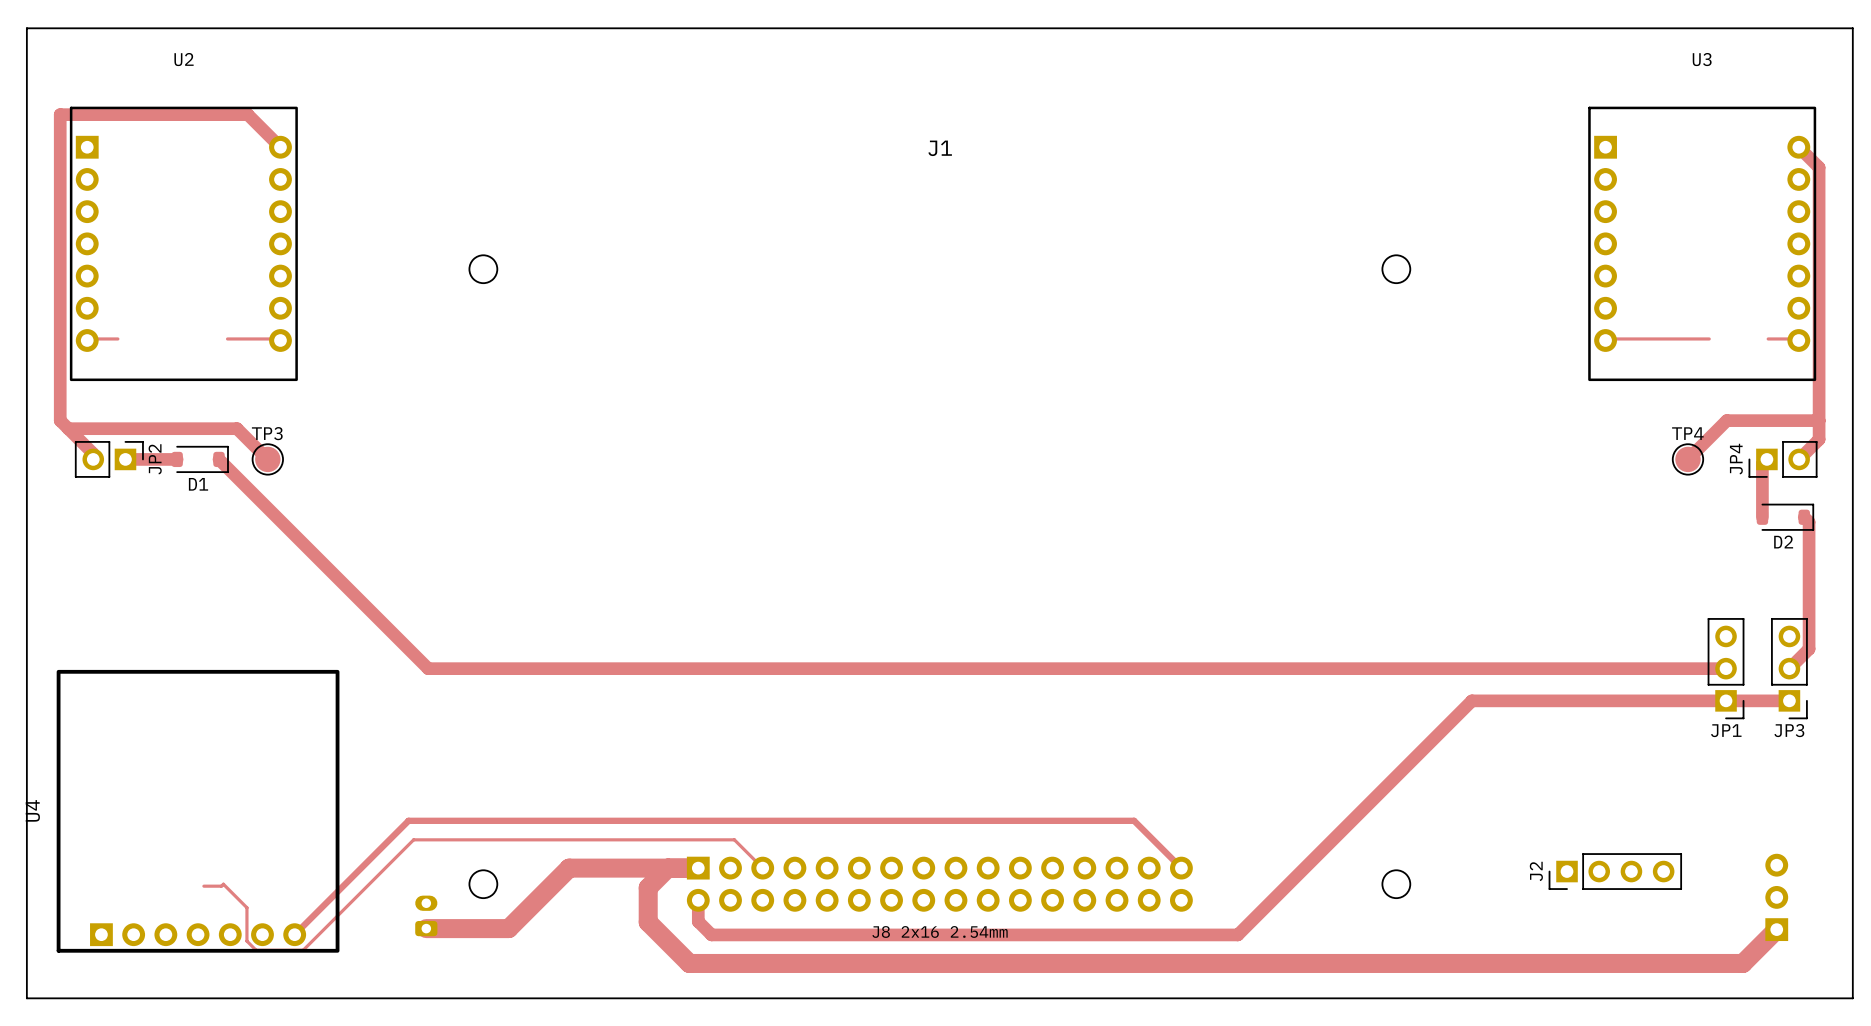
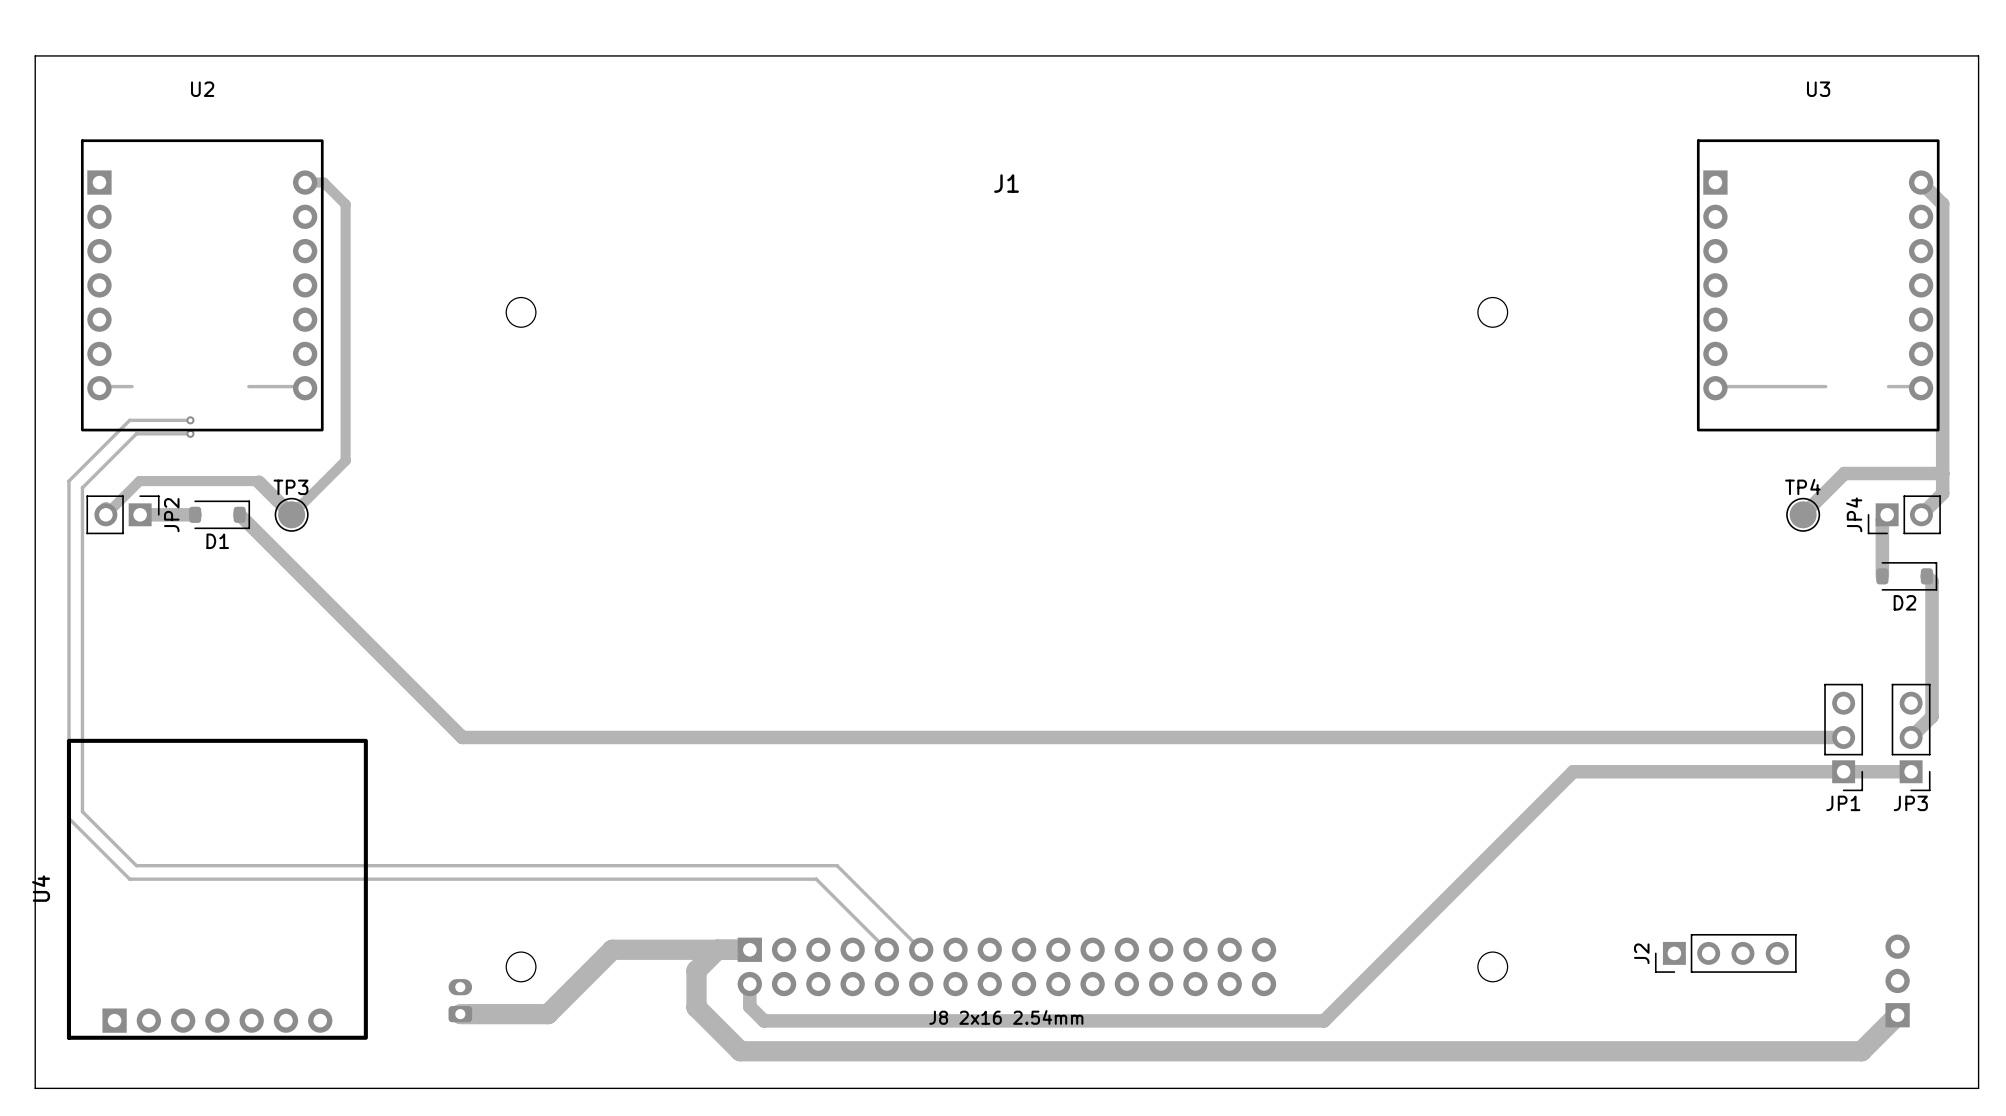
track: (280, 147) (247, 114) (60, 114) (60, 420) (93, 453) -> (305, 182) (323, 182) (345, 204) (345, 460) (291, 514)
track: none -> (190, 420) (129, 420) (68, 481) (68, 818) (129, 879) (816, 879) (886, 949)
via: none -> (190, 420)
track: none -> (190, 433) (136, 433) (82, 487) (82, 811) (136, 865) (837, 865) (921, 949)
via: none -> (190, 433)
track: (68, 428) (237, 428) -> (105, 514) (139, 481) (258, 482)
track: (762, 868) (734, 839) (413, 839) (303, 950) (256, 950) (246, 941) (246, 907) (223, 884) (221, 886) (203, 886) -> none
track: (1181, 868) (1134, 820) (408, 820) (294, 934) -> none

